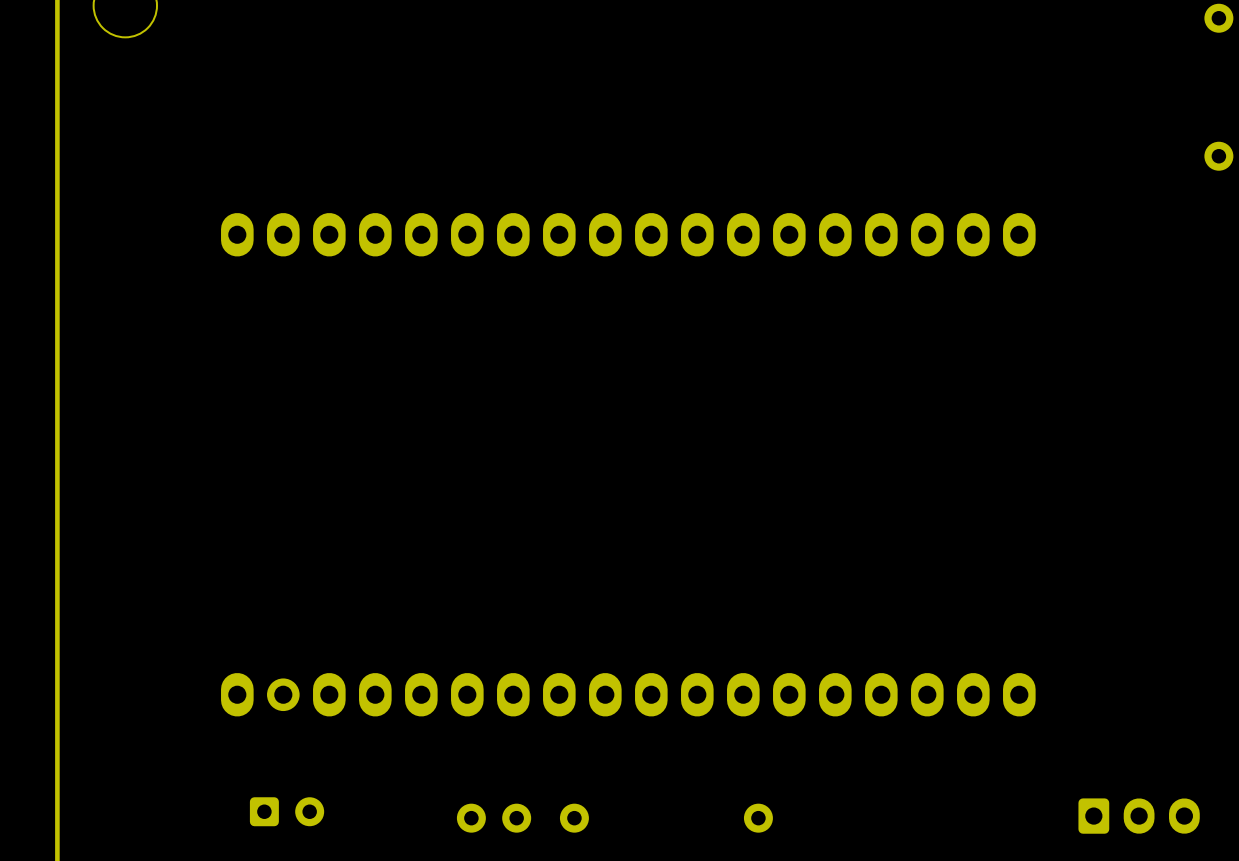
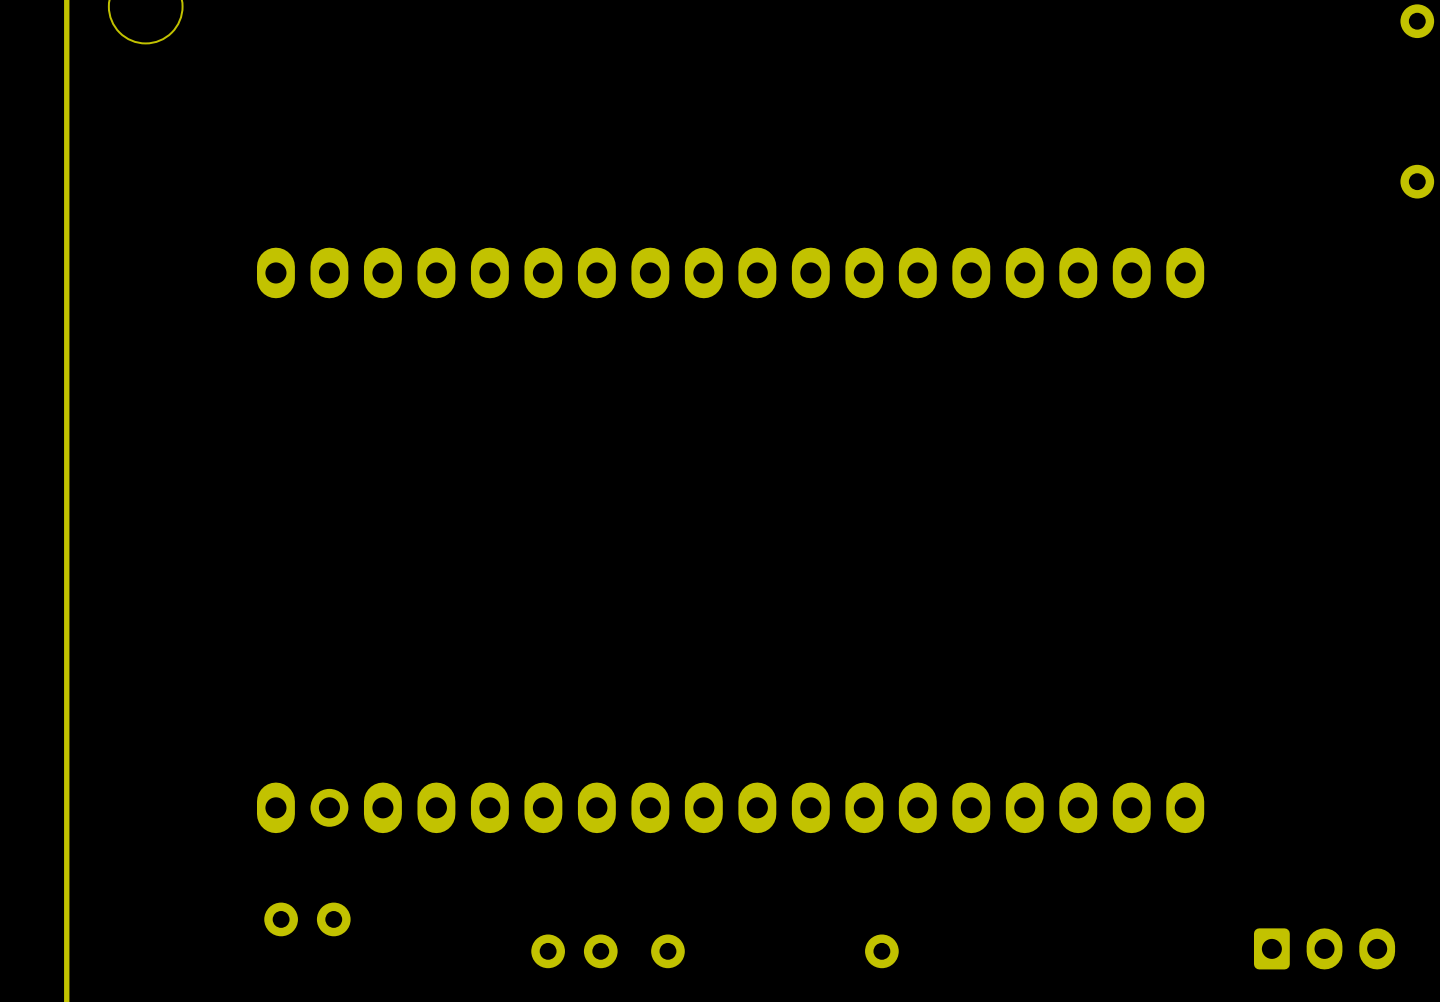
part: none -> (307, 919)
part: (287, 811) -> none

